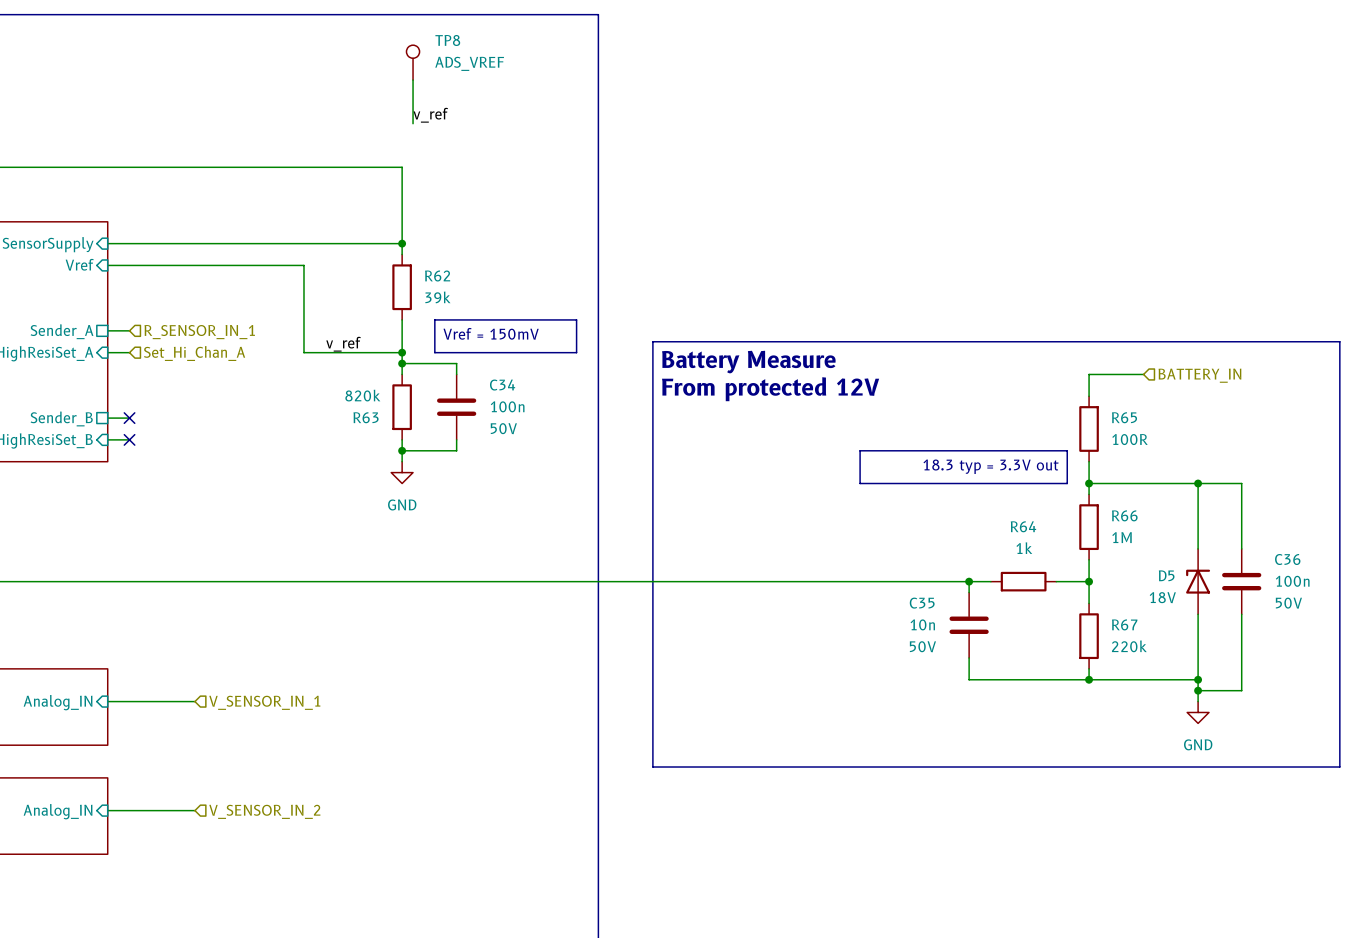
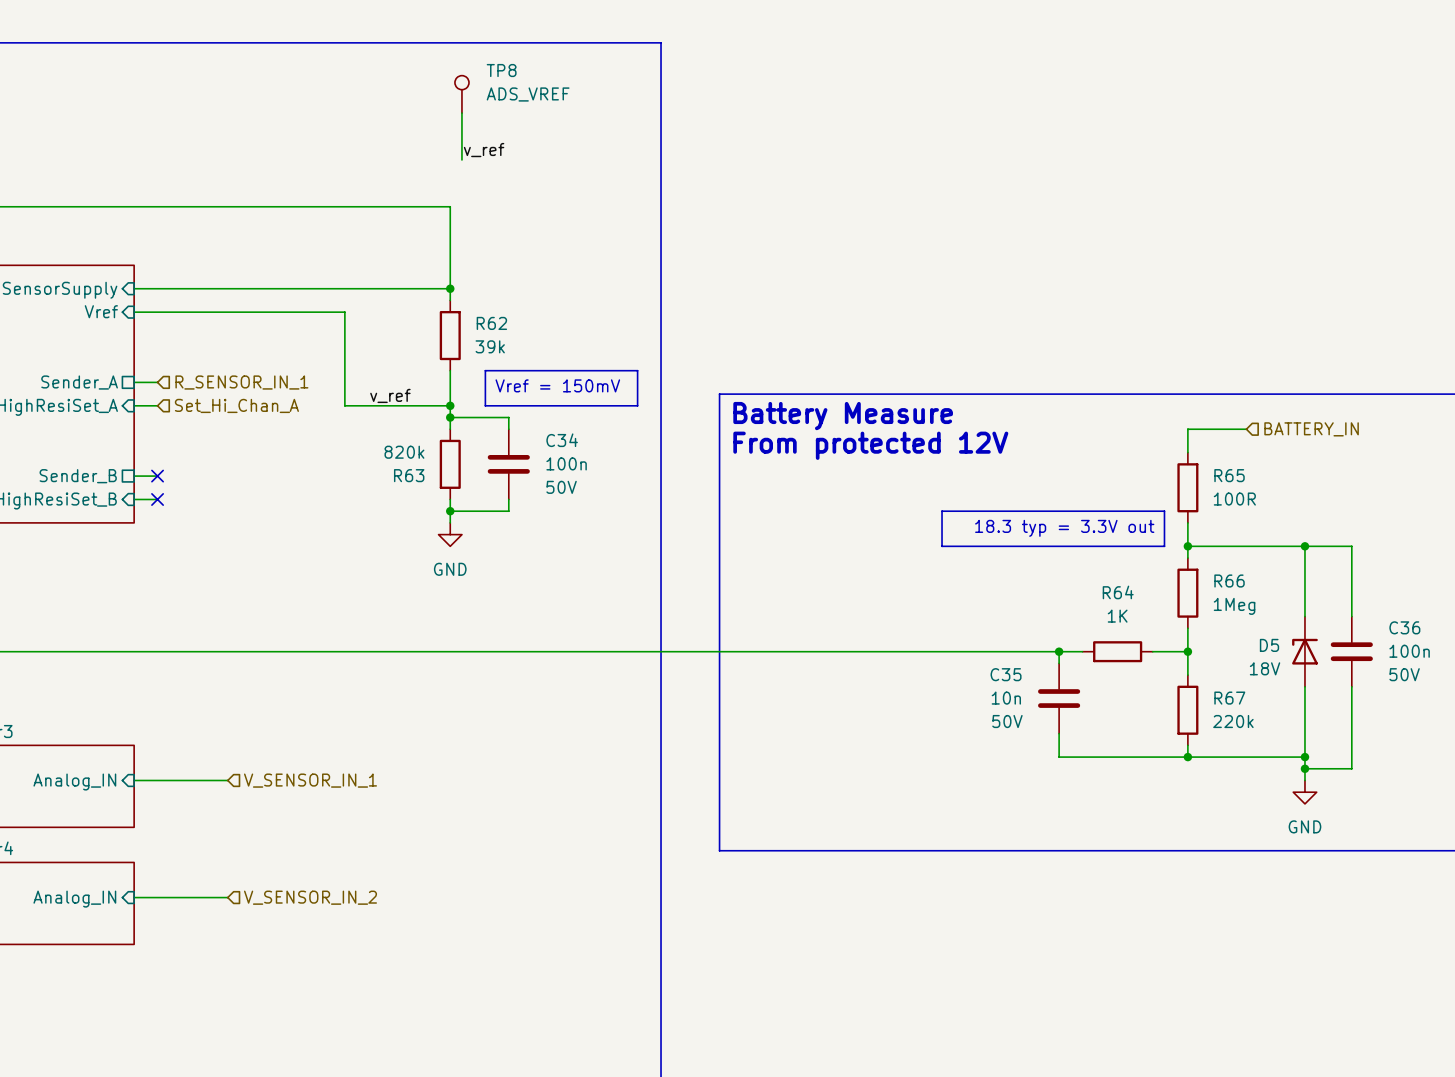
R66 value: 1M (1122, 537) -> 1Meg (1234, 606)
R64 value: 1k (1024, 548) -> 1K (1117, 616)

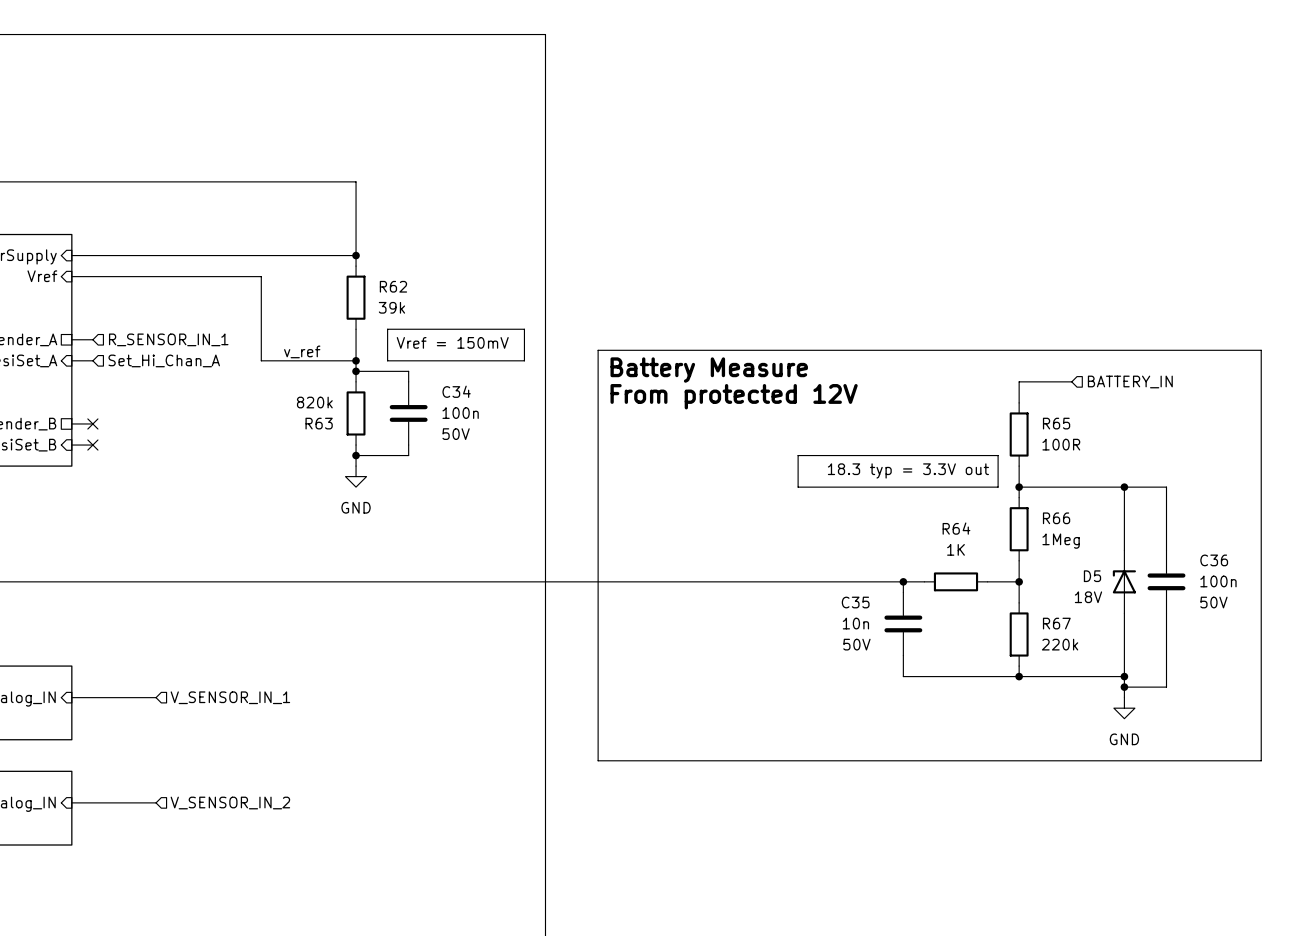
TP8: ADS_VREF (461, 94) -> none
wire: (461, 113) (461, 159) -> none
label: v_ref (484, 150) -> none

